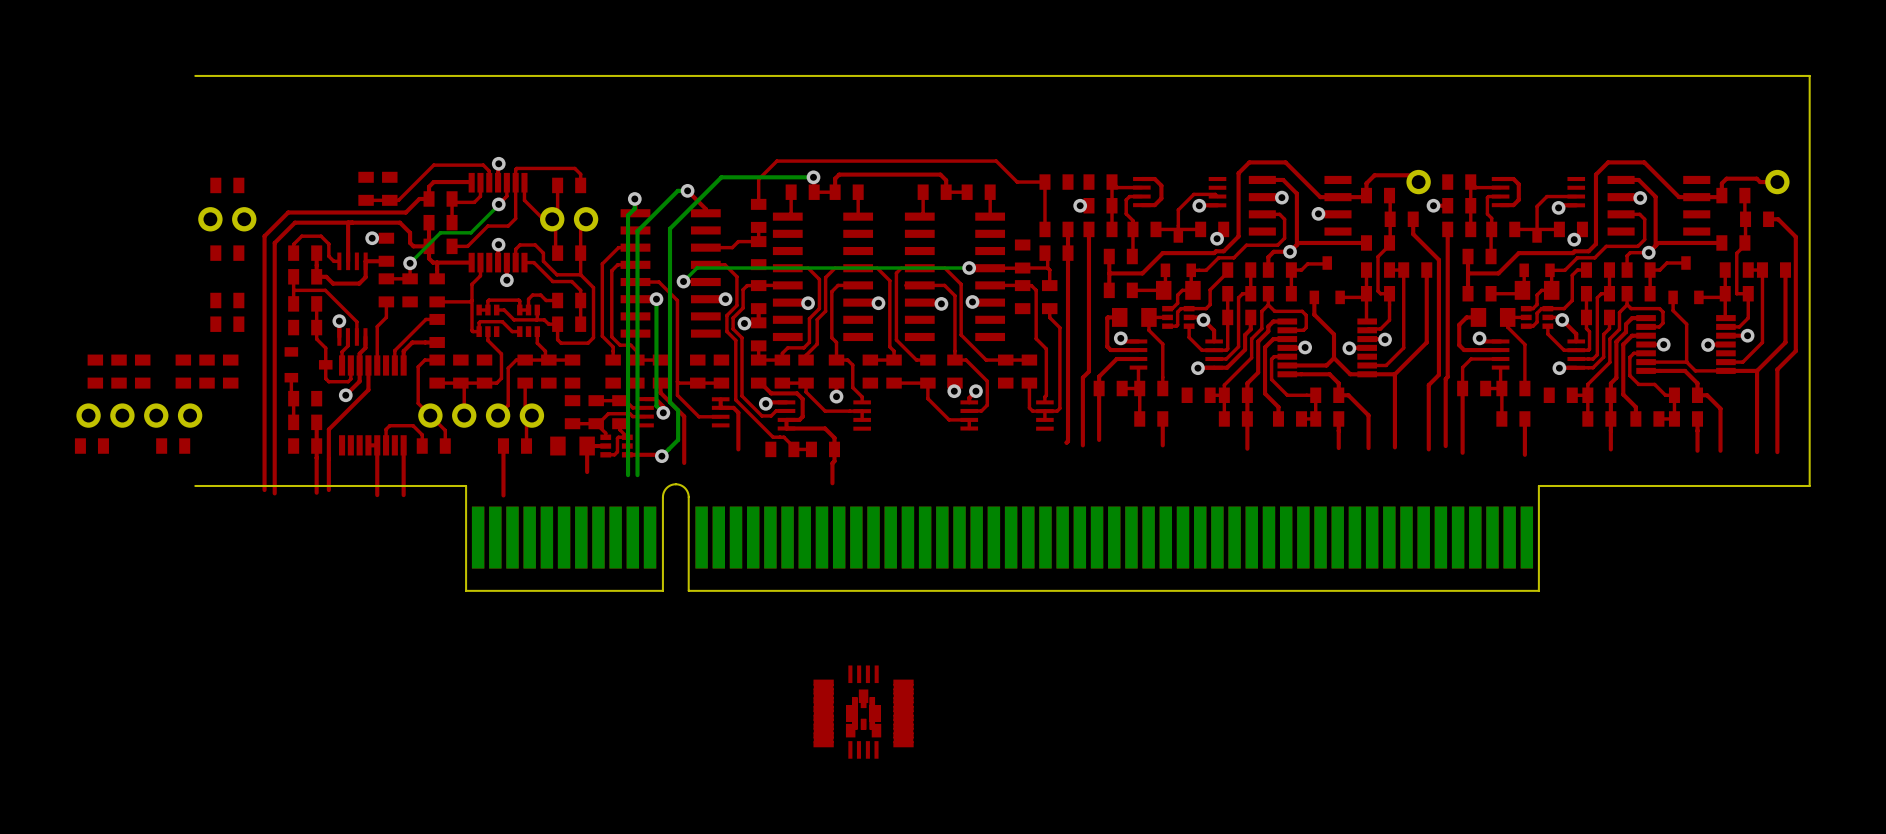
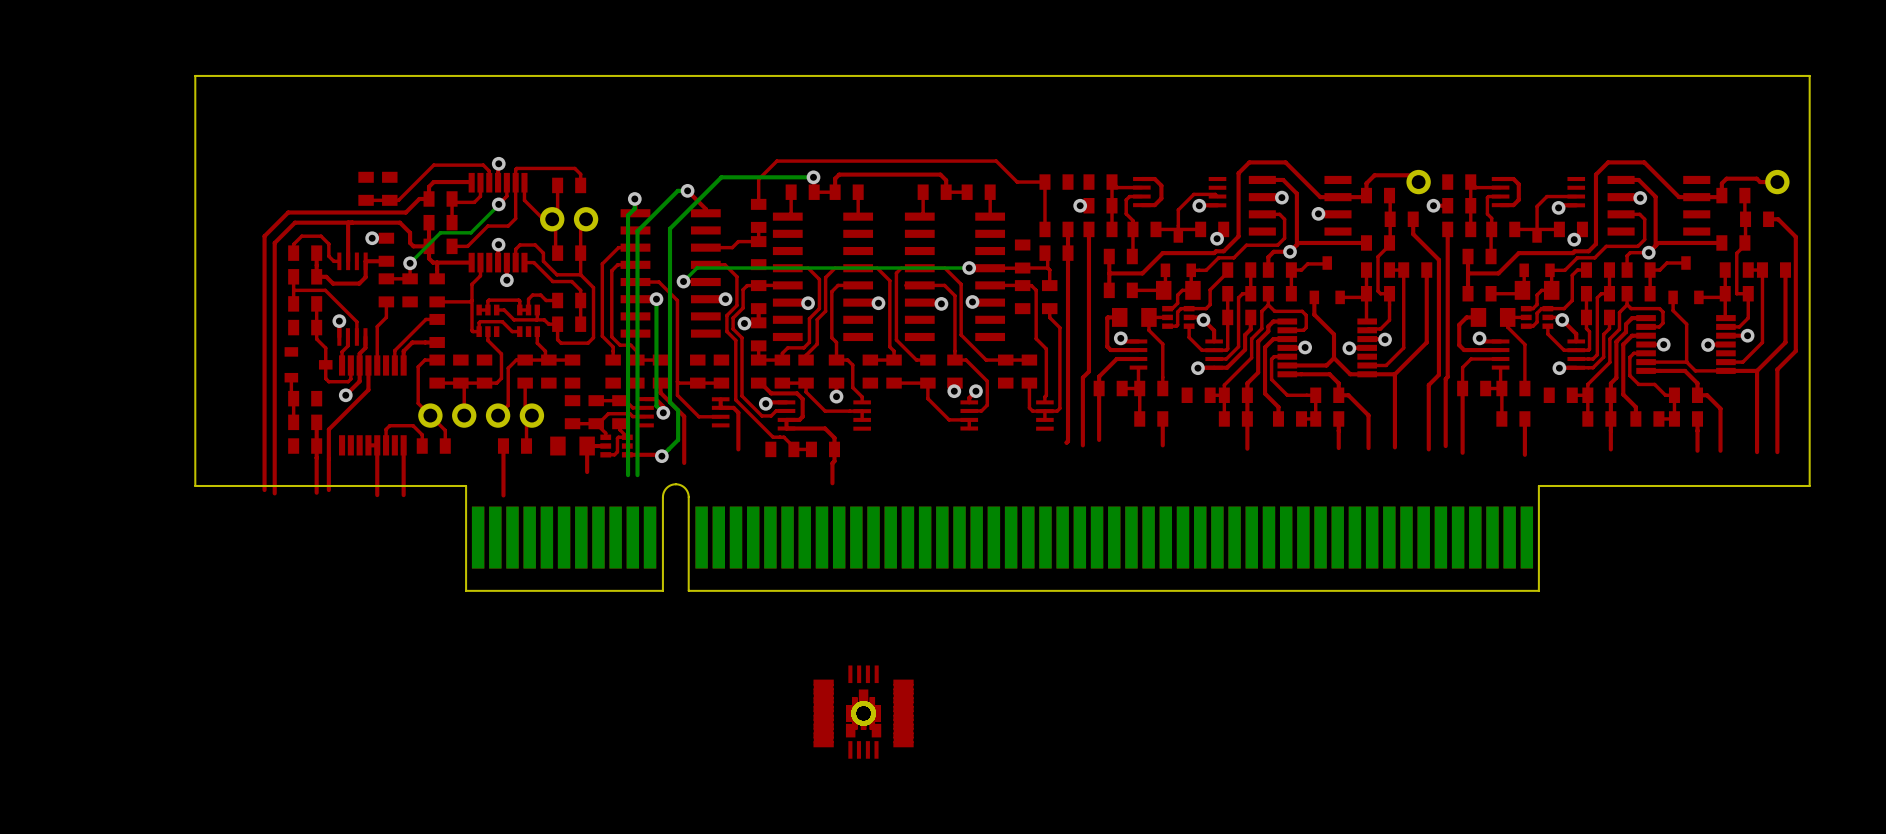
board edge: none -> (195, 75) (195, 485)
part: (227, 185) -> none
part: (210, 219) -> none
part: (244, 219) -> none
part: (227, 253) -> none
part: (227, 300) -> none
part: (227, 324) -> none
part: (95, 371) -> none
part: (119, 371) -> none
part: (142, 371) -> none
part: (183, 371) -> none
part: (207, 371) -> none
part: (230, 371) -> none
part: (88, 415) -> none
part: (122, 415) -> none
part: (156, 415) -> none
part: (190, 415) -> none
part: (91, 446) -> none
part: (173, 446) -> none
part: none -> (863, 713)

